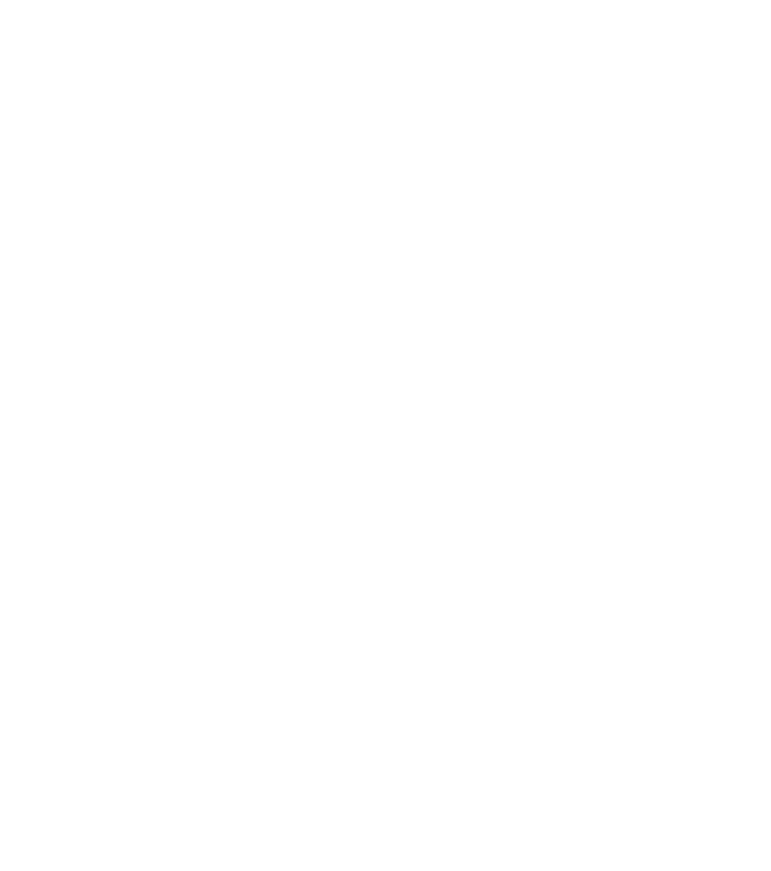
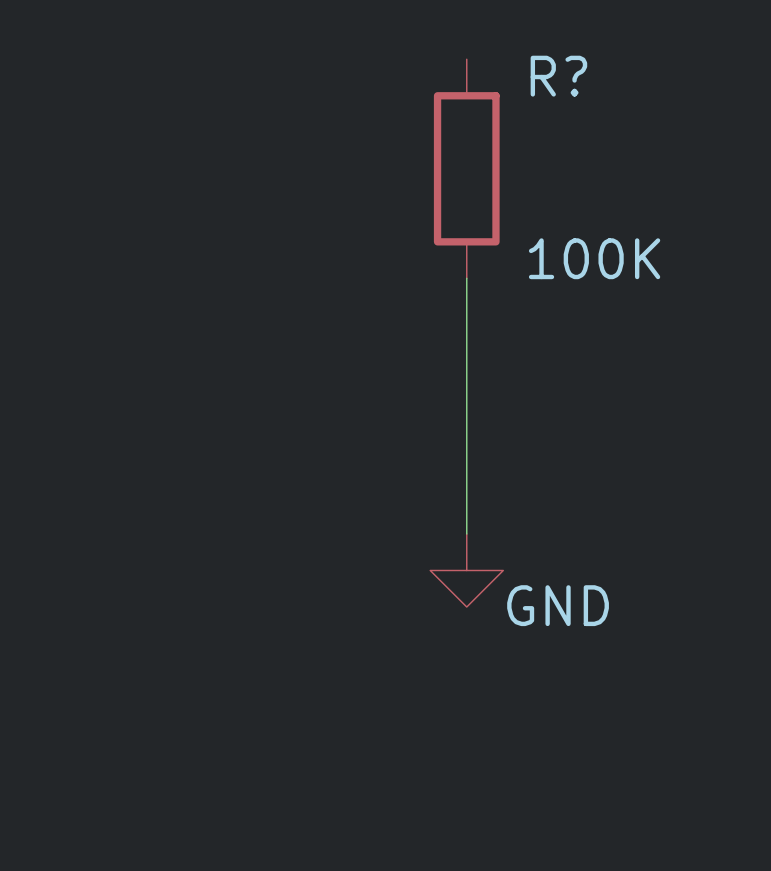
R?: none -> 100K (466, 168)
wire: none -> (466, 278) (466, 533)
power symbol: none -> GND (466, 570)

